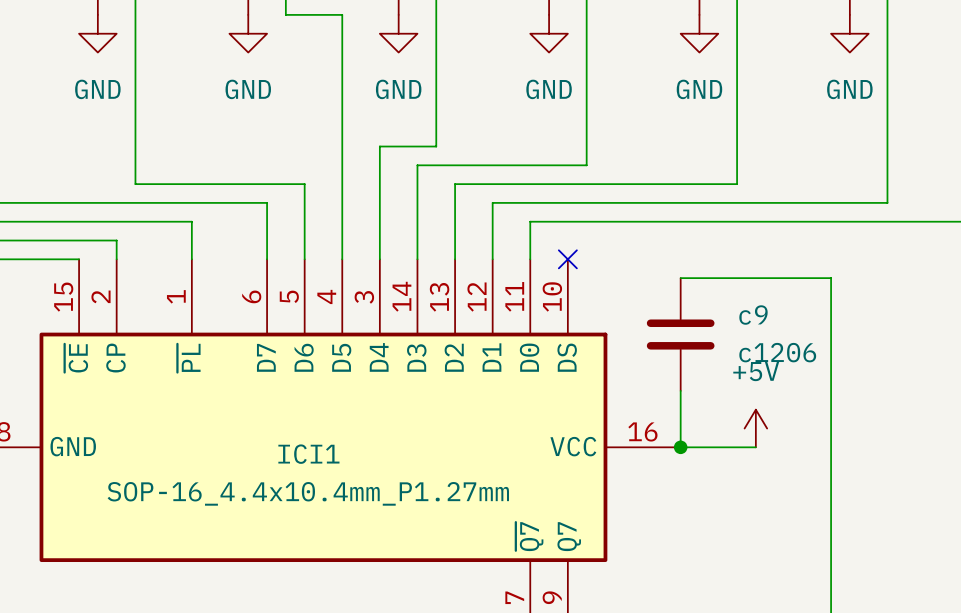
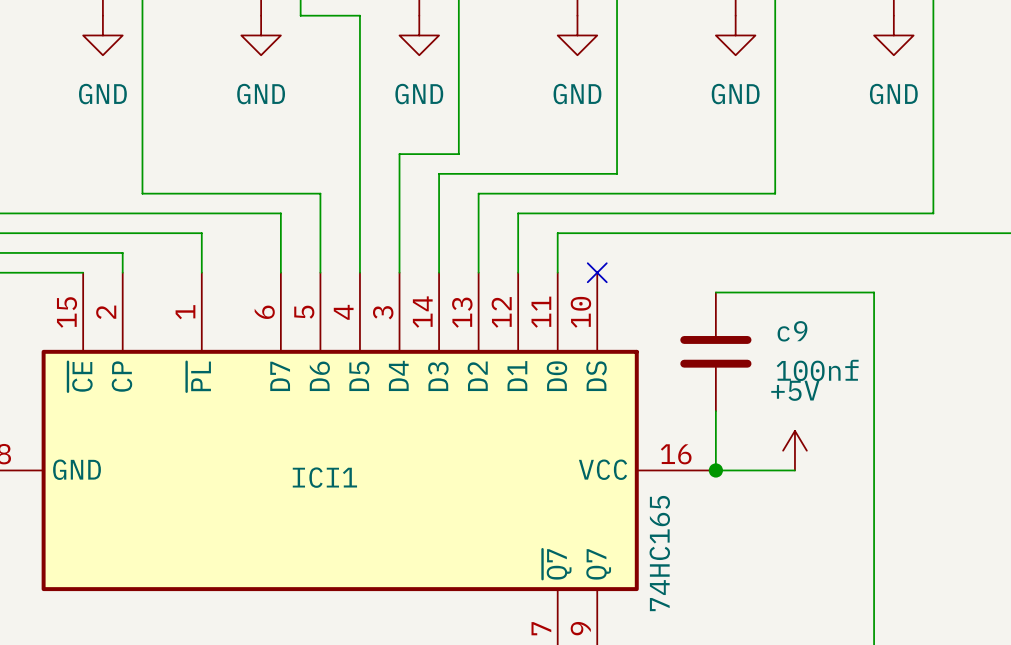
c9 value: c1206 (777, 352) -> 100nf (817, 370)
ICI1 value: SOP-16_4.4x10.4mm_P1.27mm (308, 493) -> 74HC165 (659, 553)

